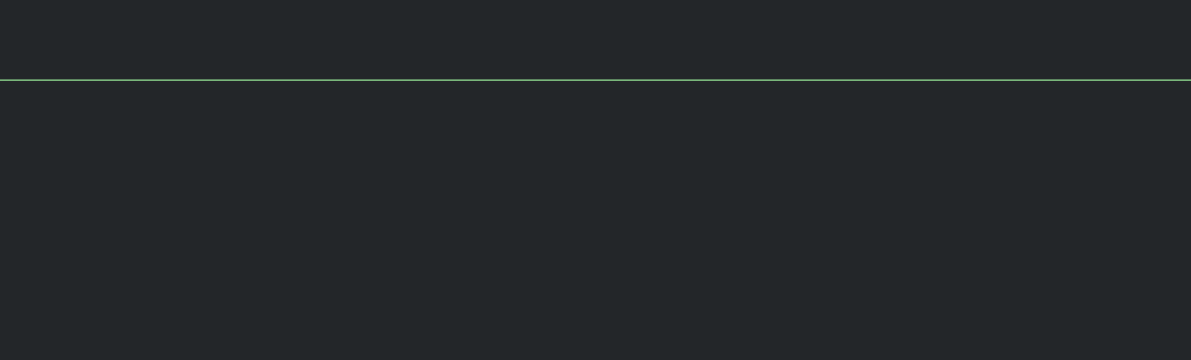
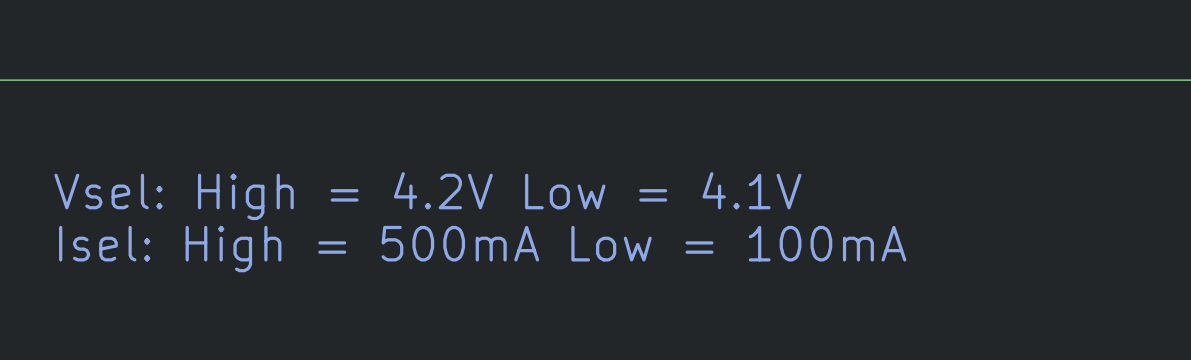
text: none -> Vsel: High = 4.2V Low = 4.1V (427, 196)
text: none -> Isel: High = 500mA Low = 100mA (482, 249)

